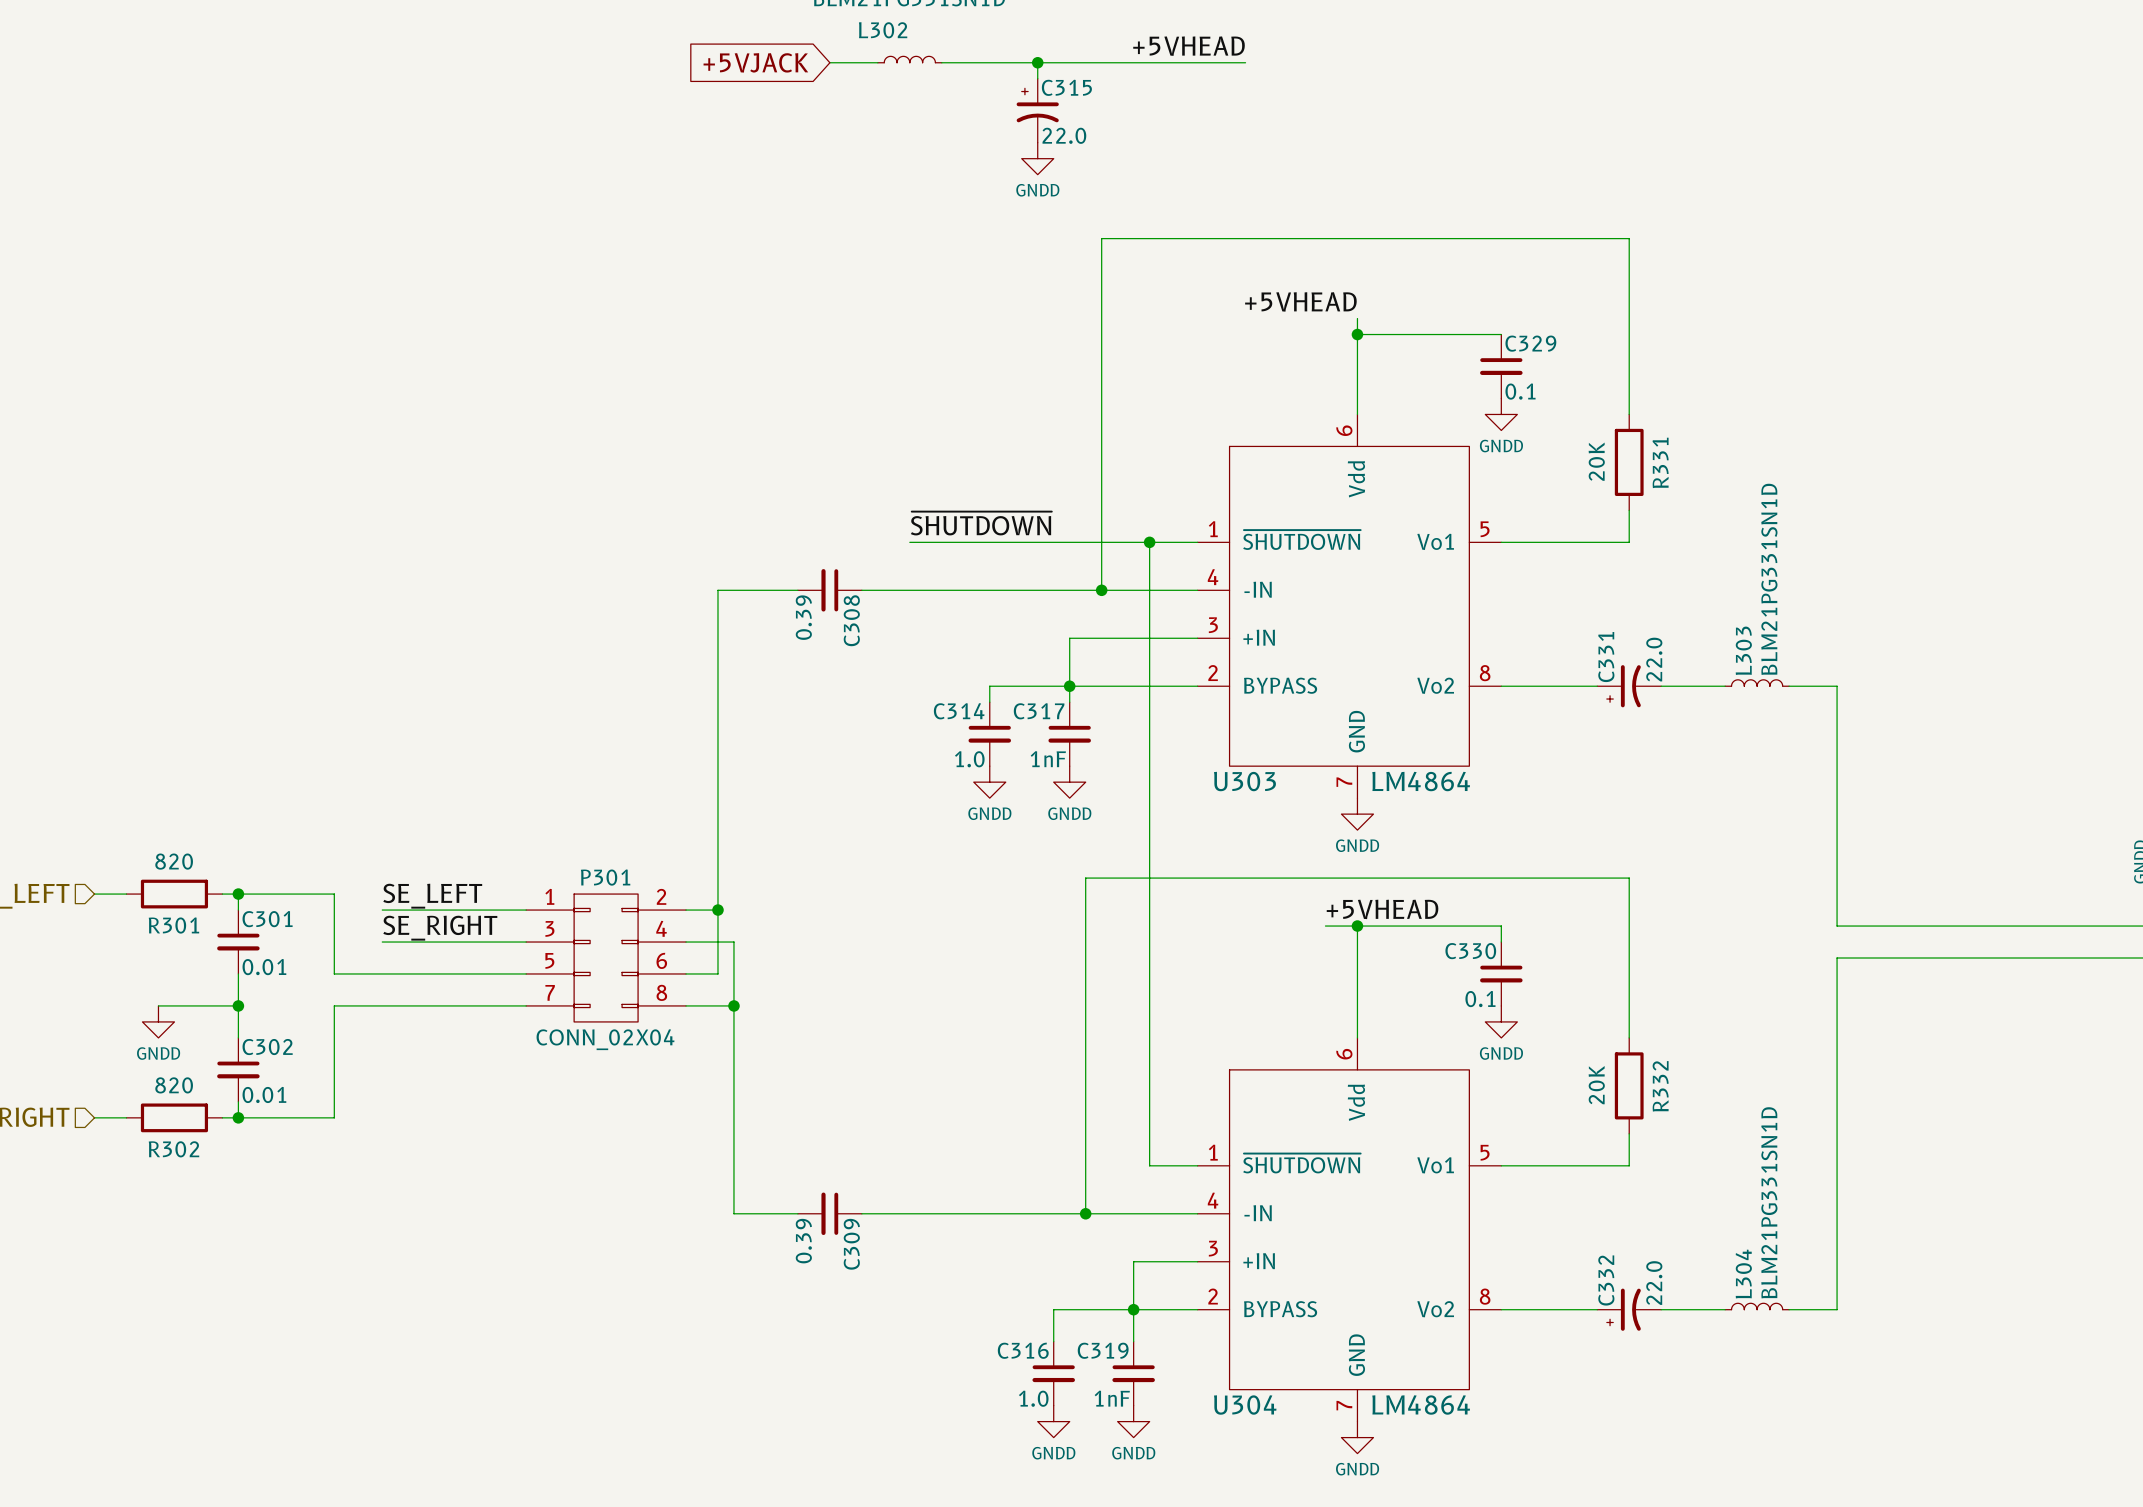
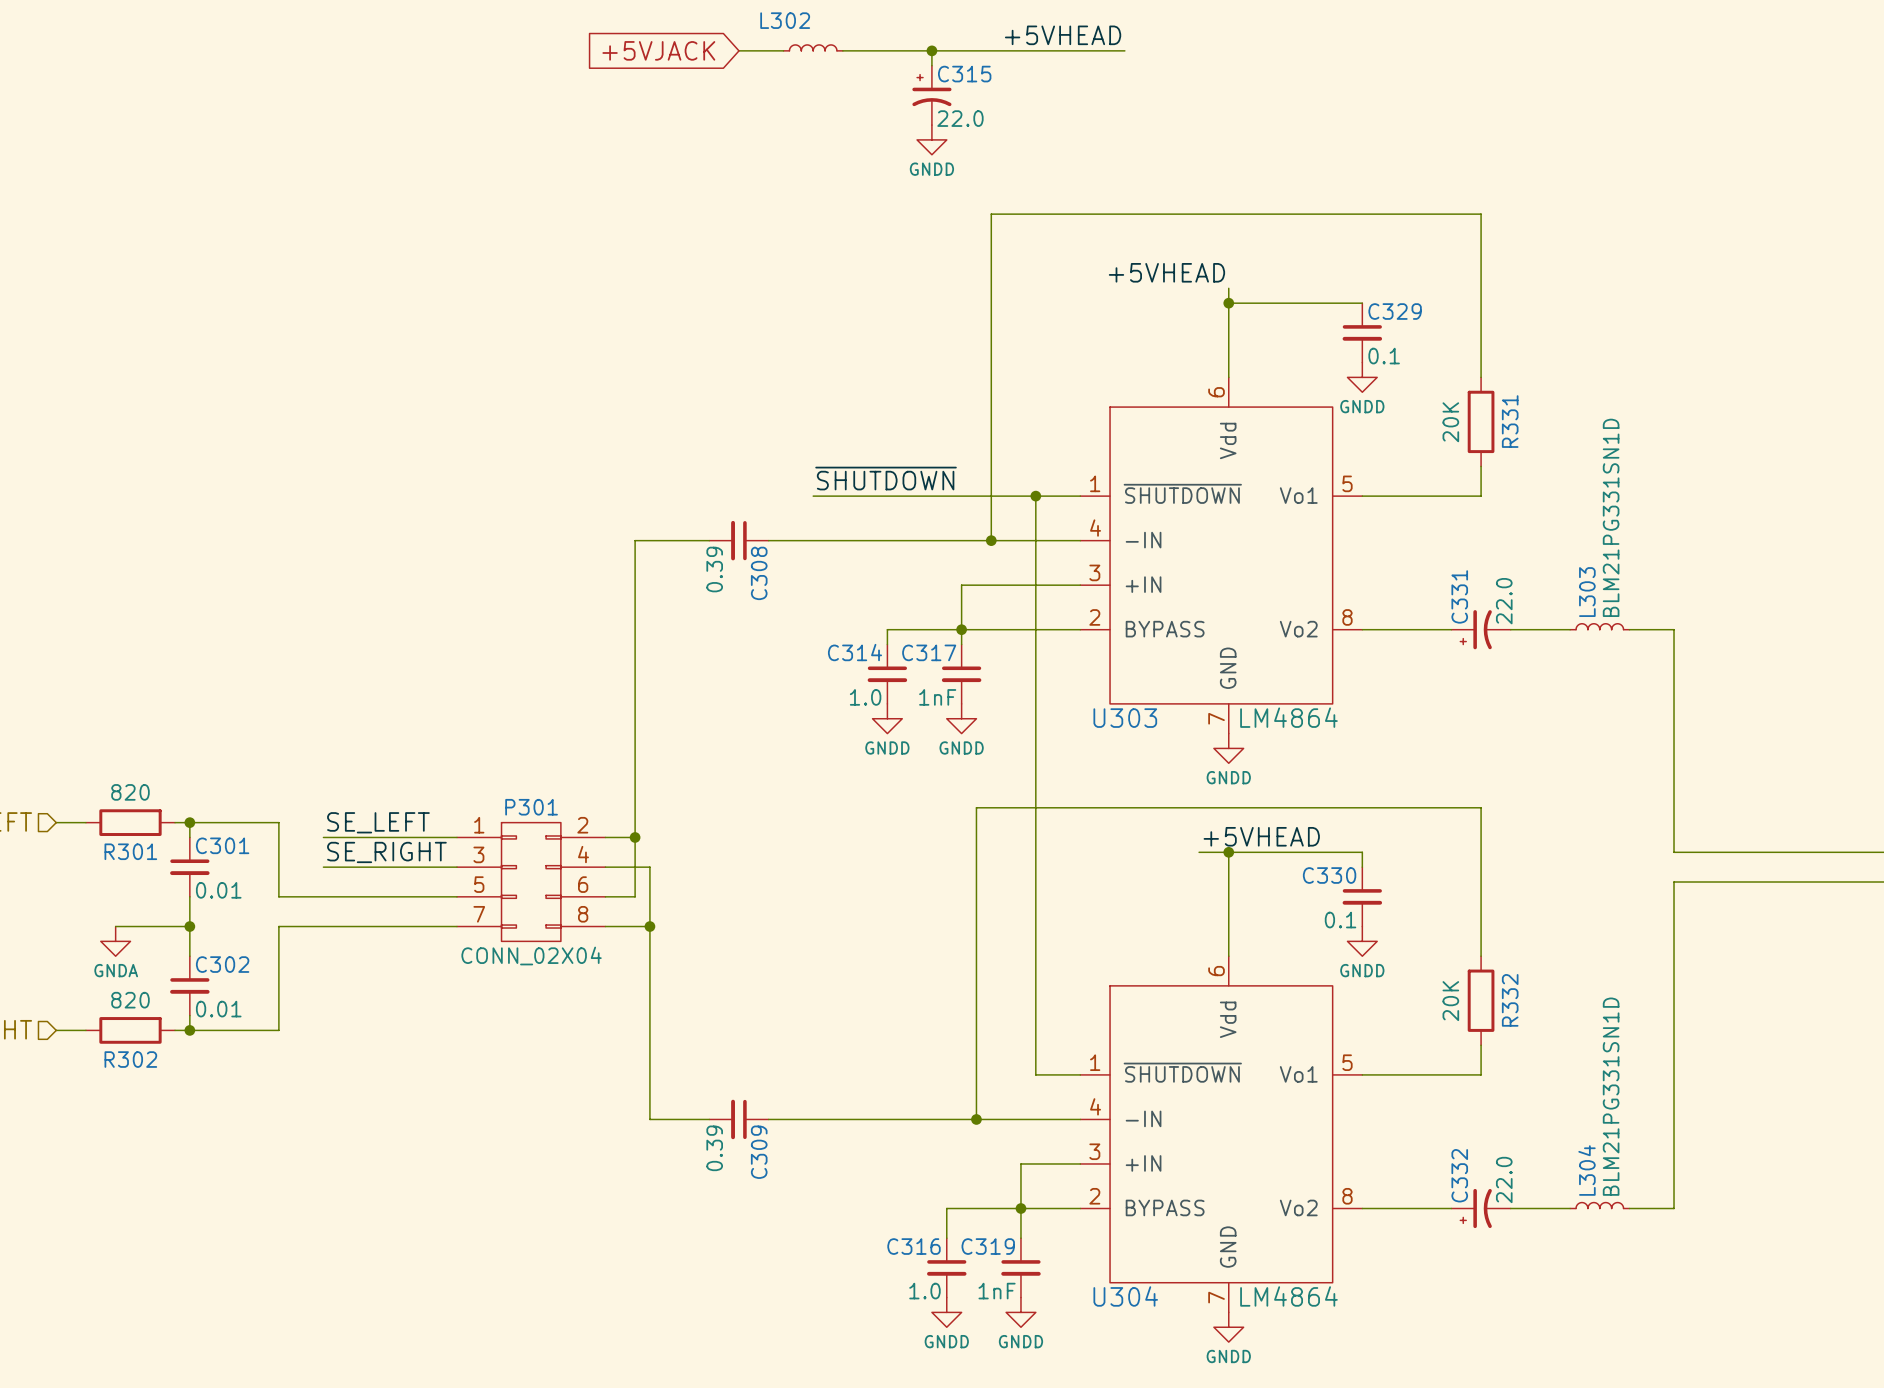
power symbol: GNDD (158, 1021) -> GNDA (115, 941)

